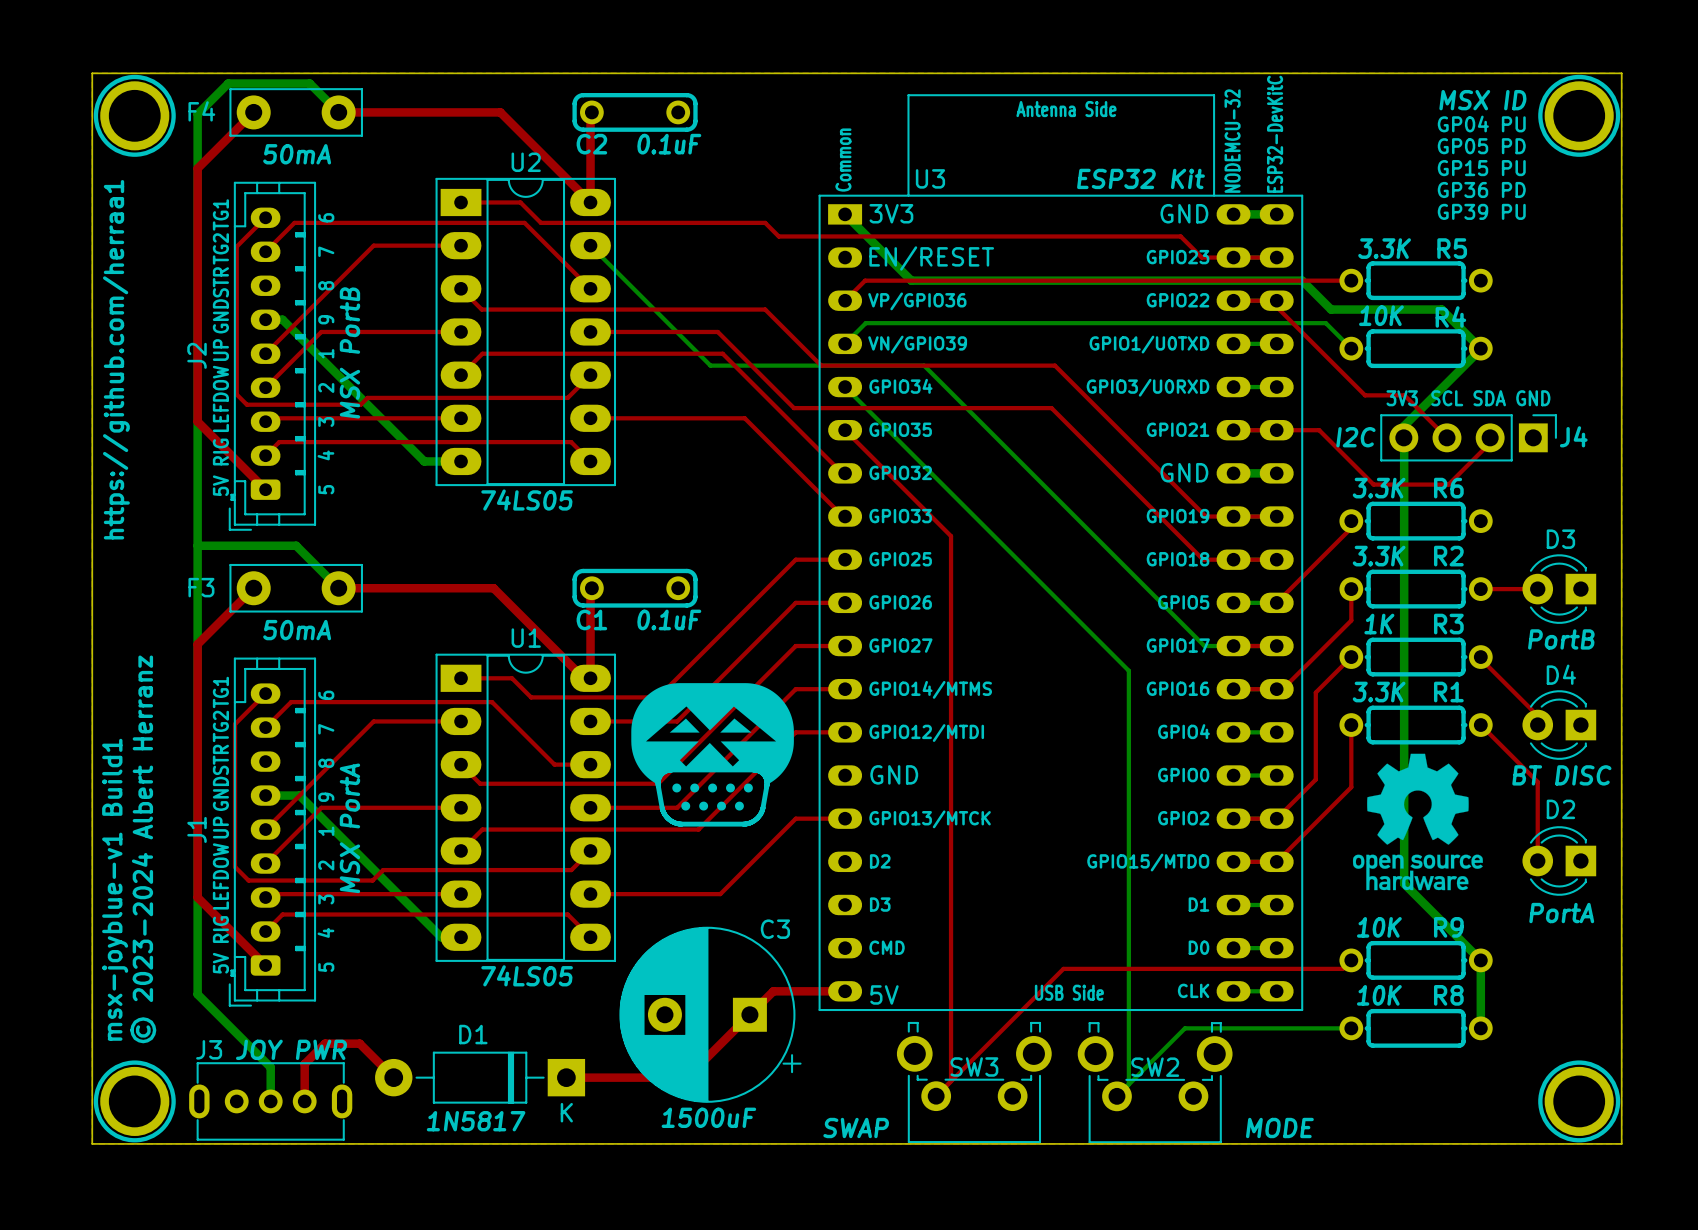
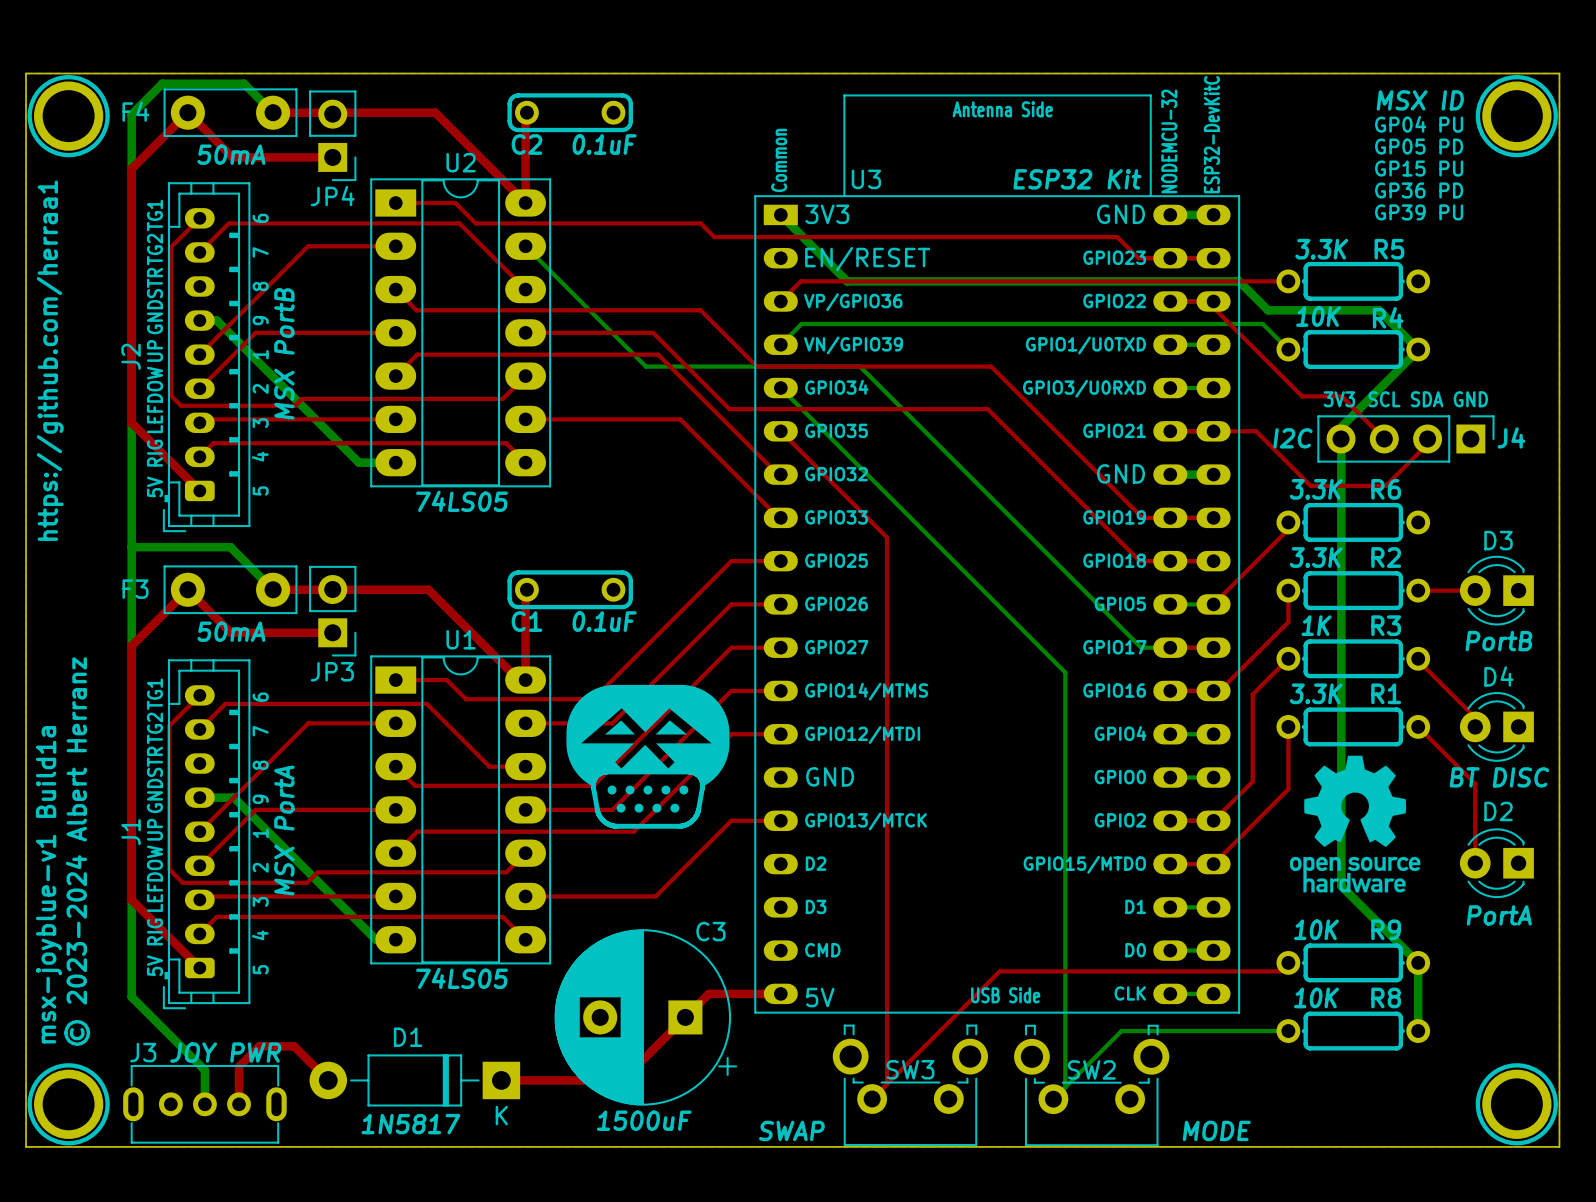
top track: none -> (187, 112) (232, 157) (332, 157)
JP4: none -> (332, 135)
top track: none -> (187, 589) (230, 632) (332, 632)
JP3: none -> (332, 611)
text: msx-joyblue-v1 Build1 (115, 889) -> msx-joyblue-v1 Build1a (48, 884)

